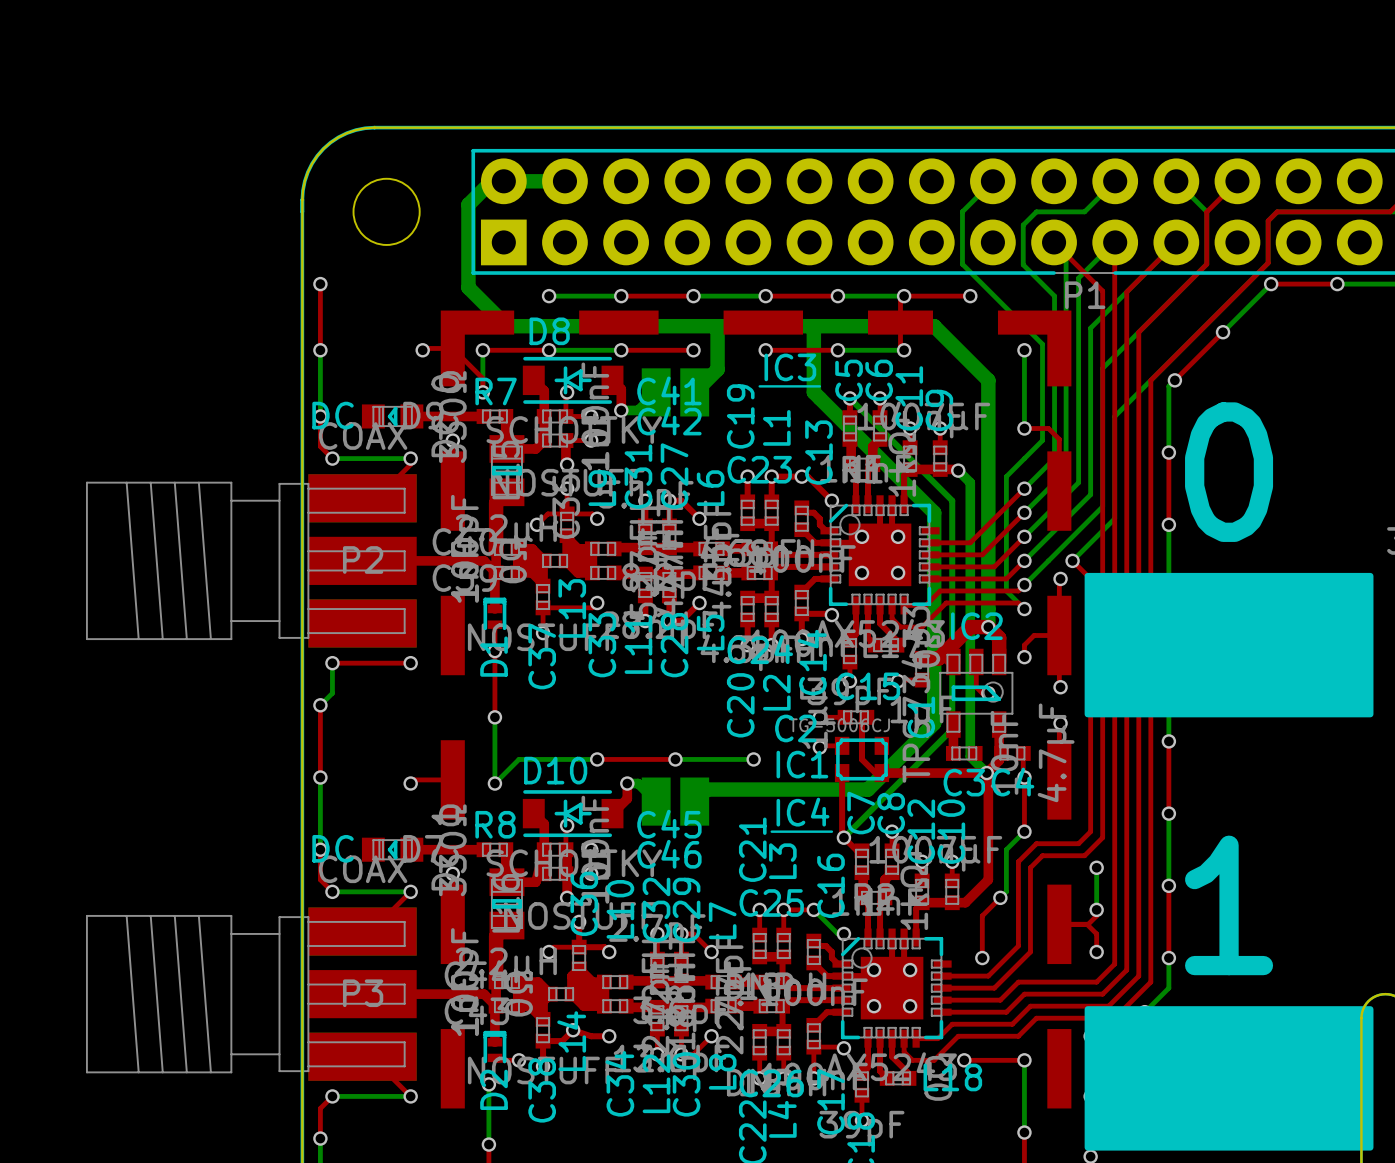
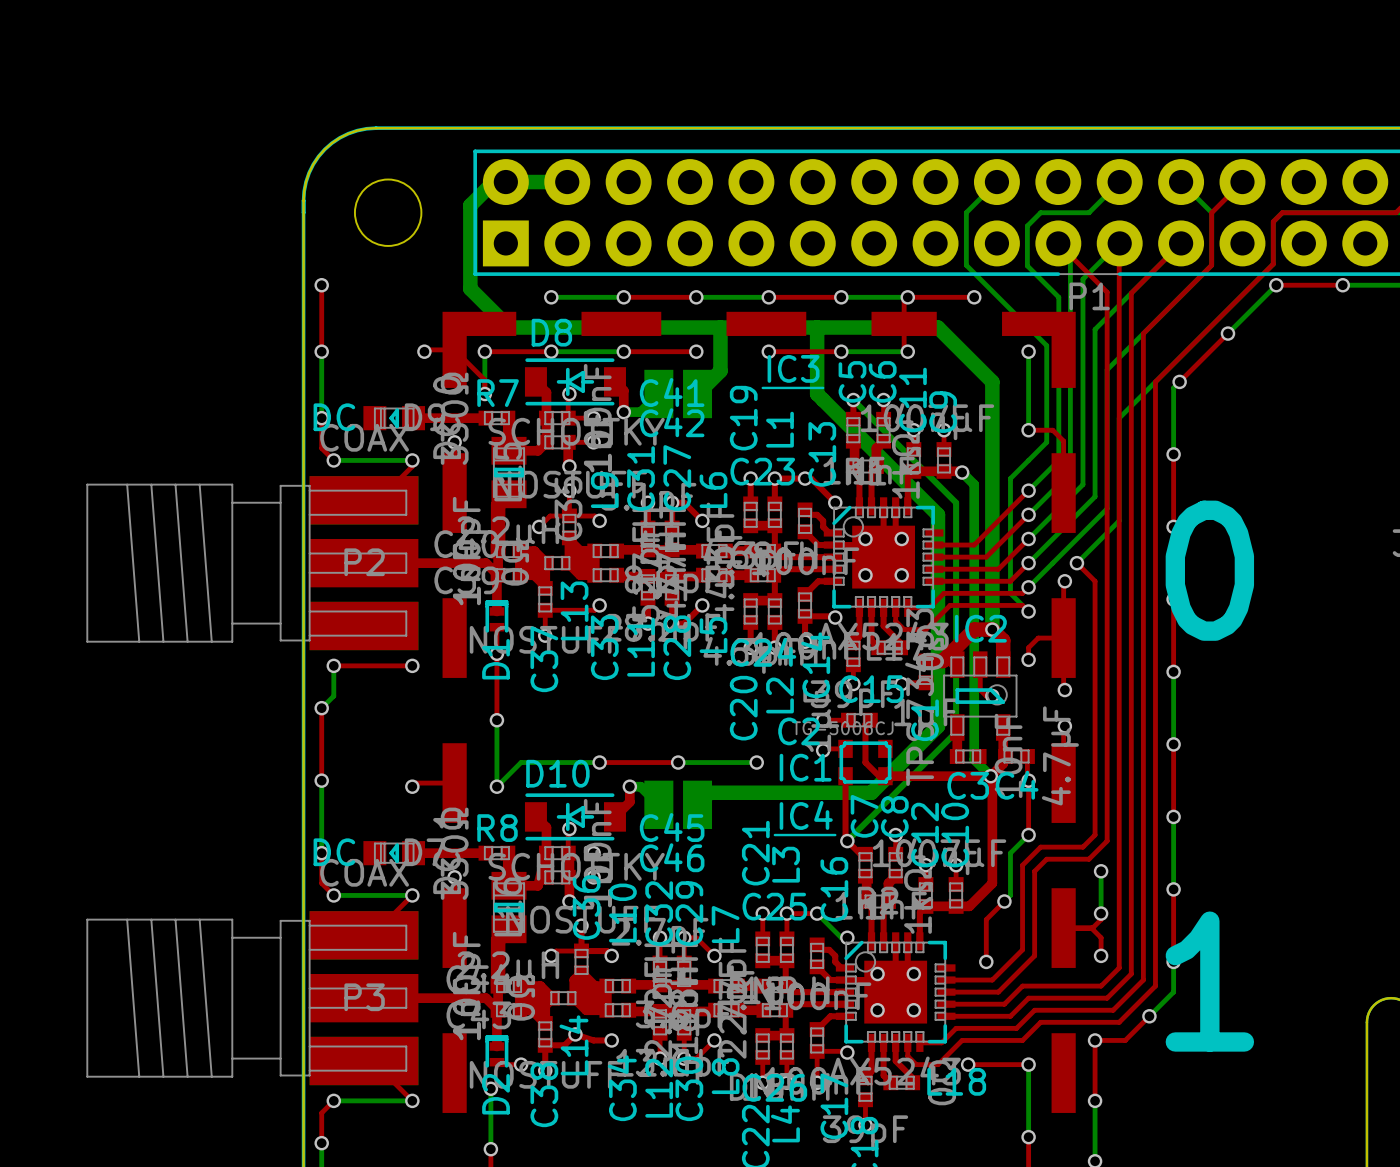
text position: 0 (1229, 472) -> 0 (1209, 570)
drawing: [1084, 572, 1374, 718] -> none
text position: 1 (1229, 905) -> 1 (1209, 981)
drawing: [1084, 1006, 1374, 1151] -> none

